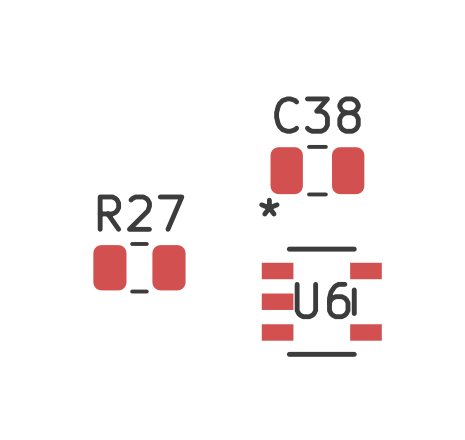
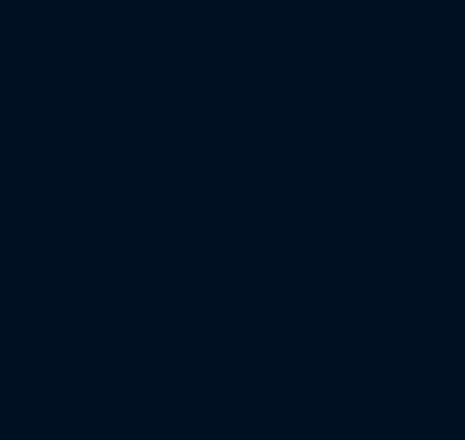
C38: (317, 170) -> none
R27: (139, 267) -> none
U6: (321, 301) -> none

